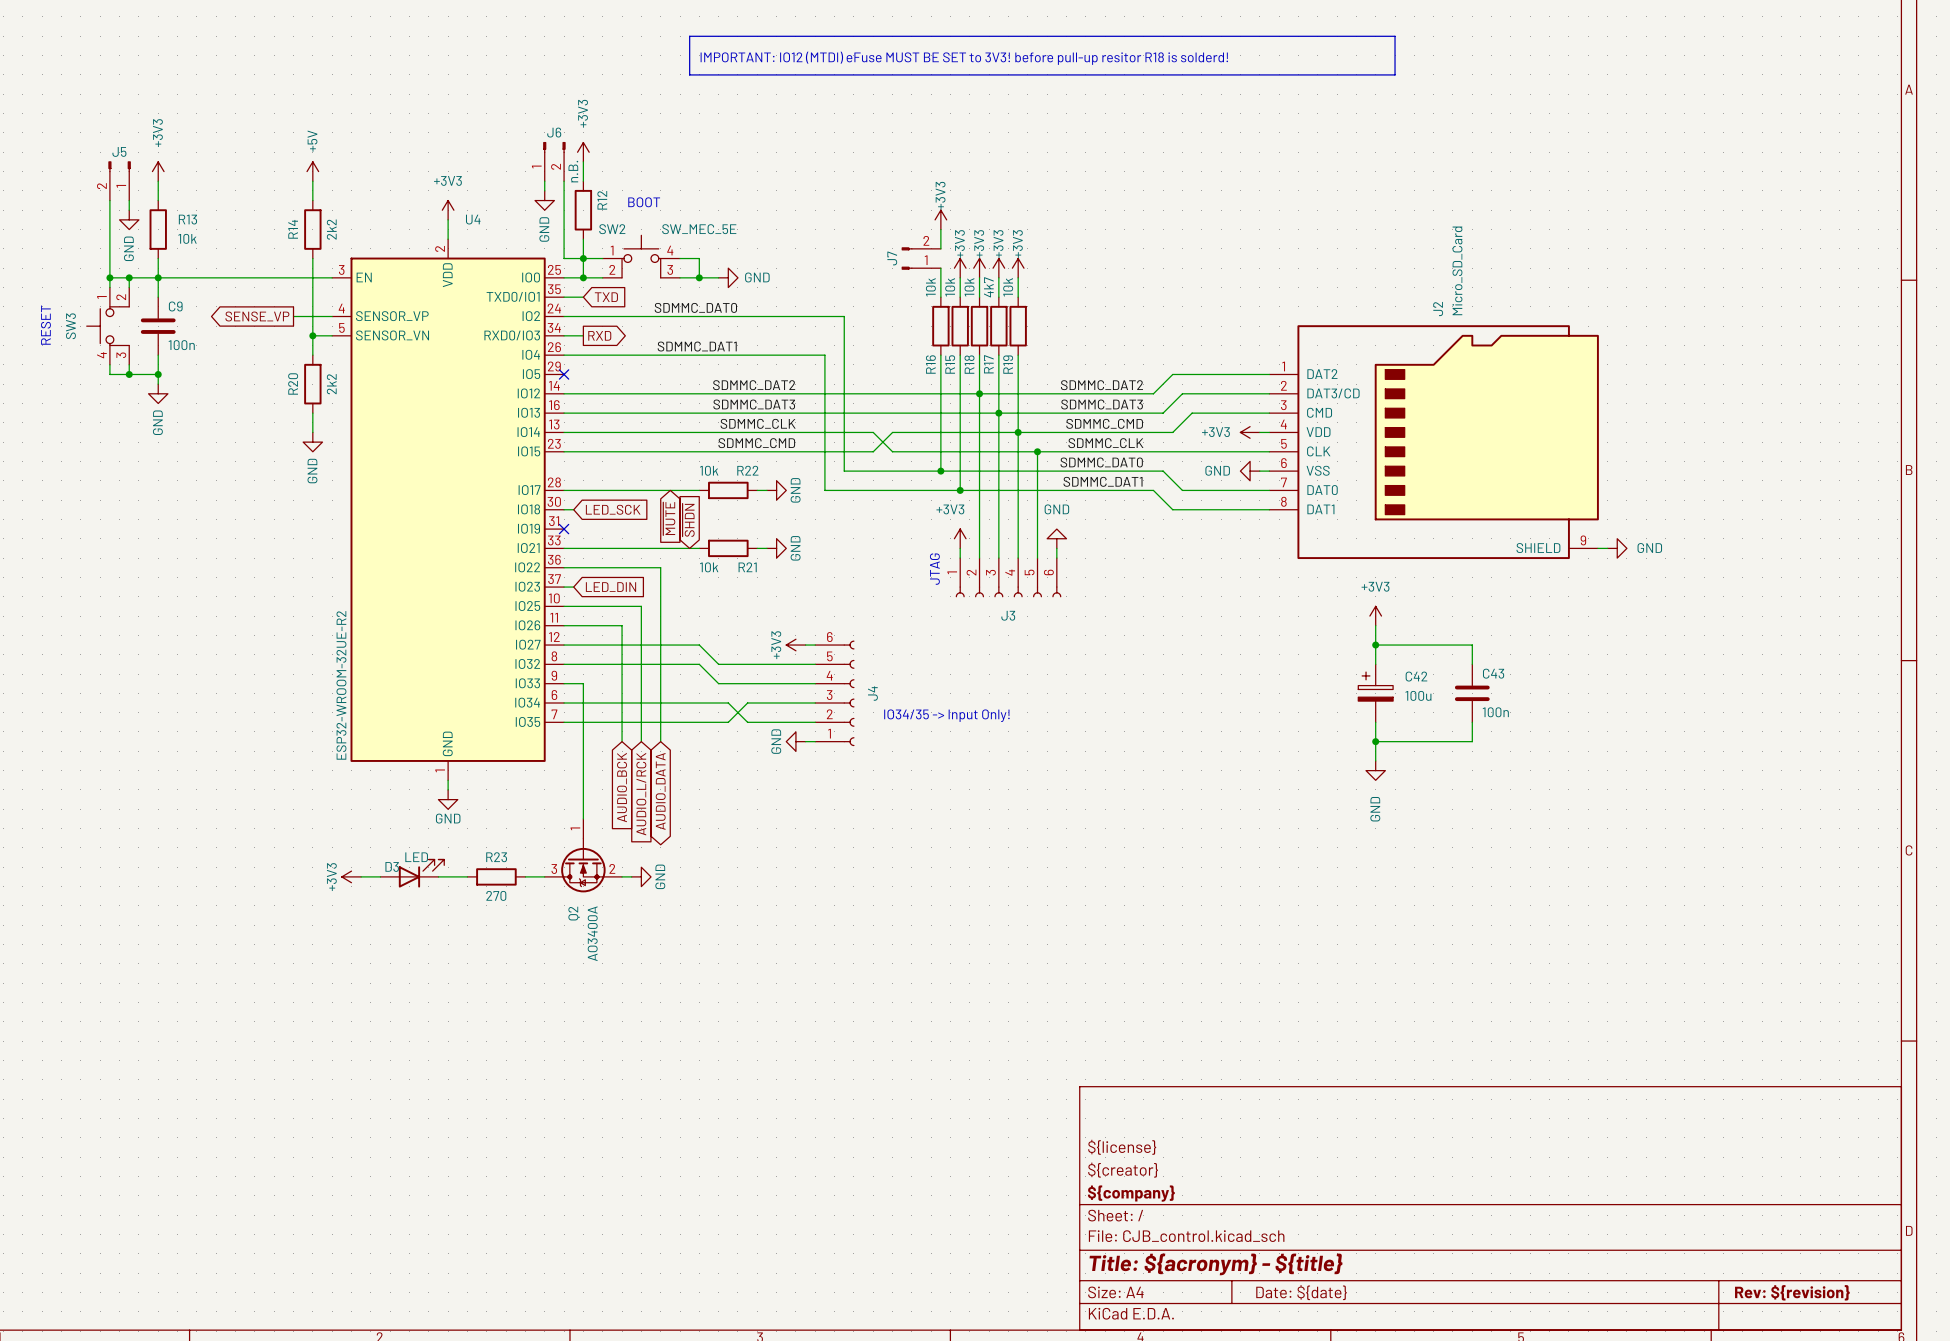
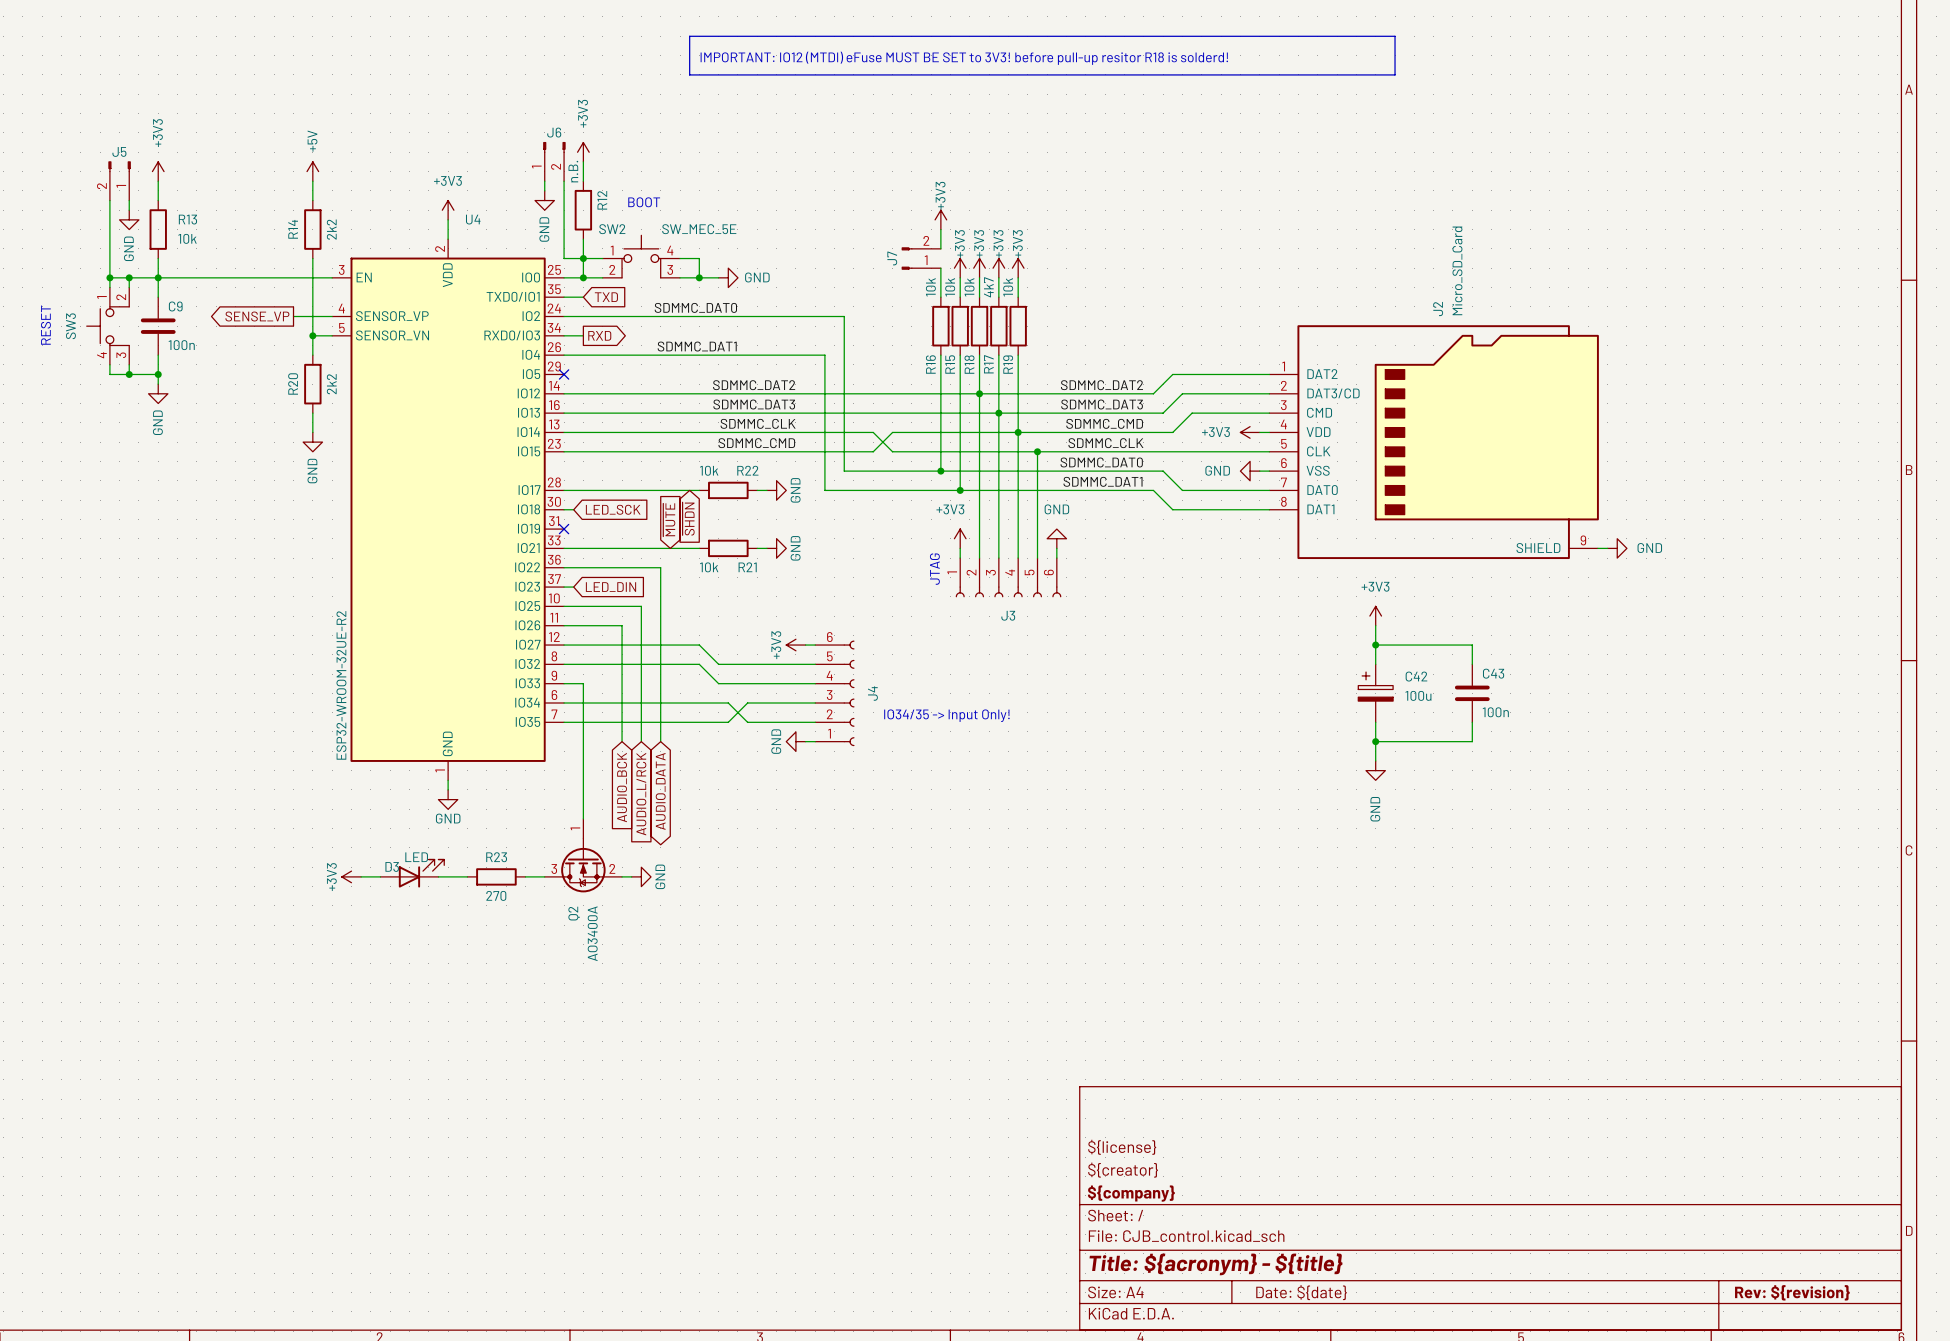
global label rotation: 0° (669, 518) -> 180° (669, 519)
global label rotation: 0° (688, 520) -> 180° (688, 518)

